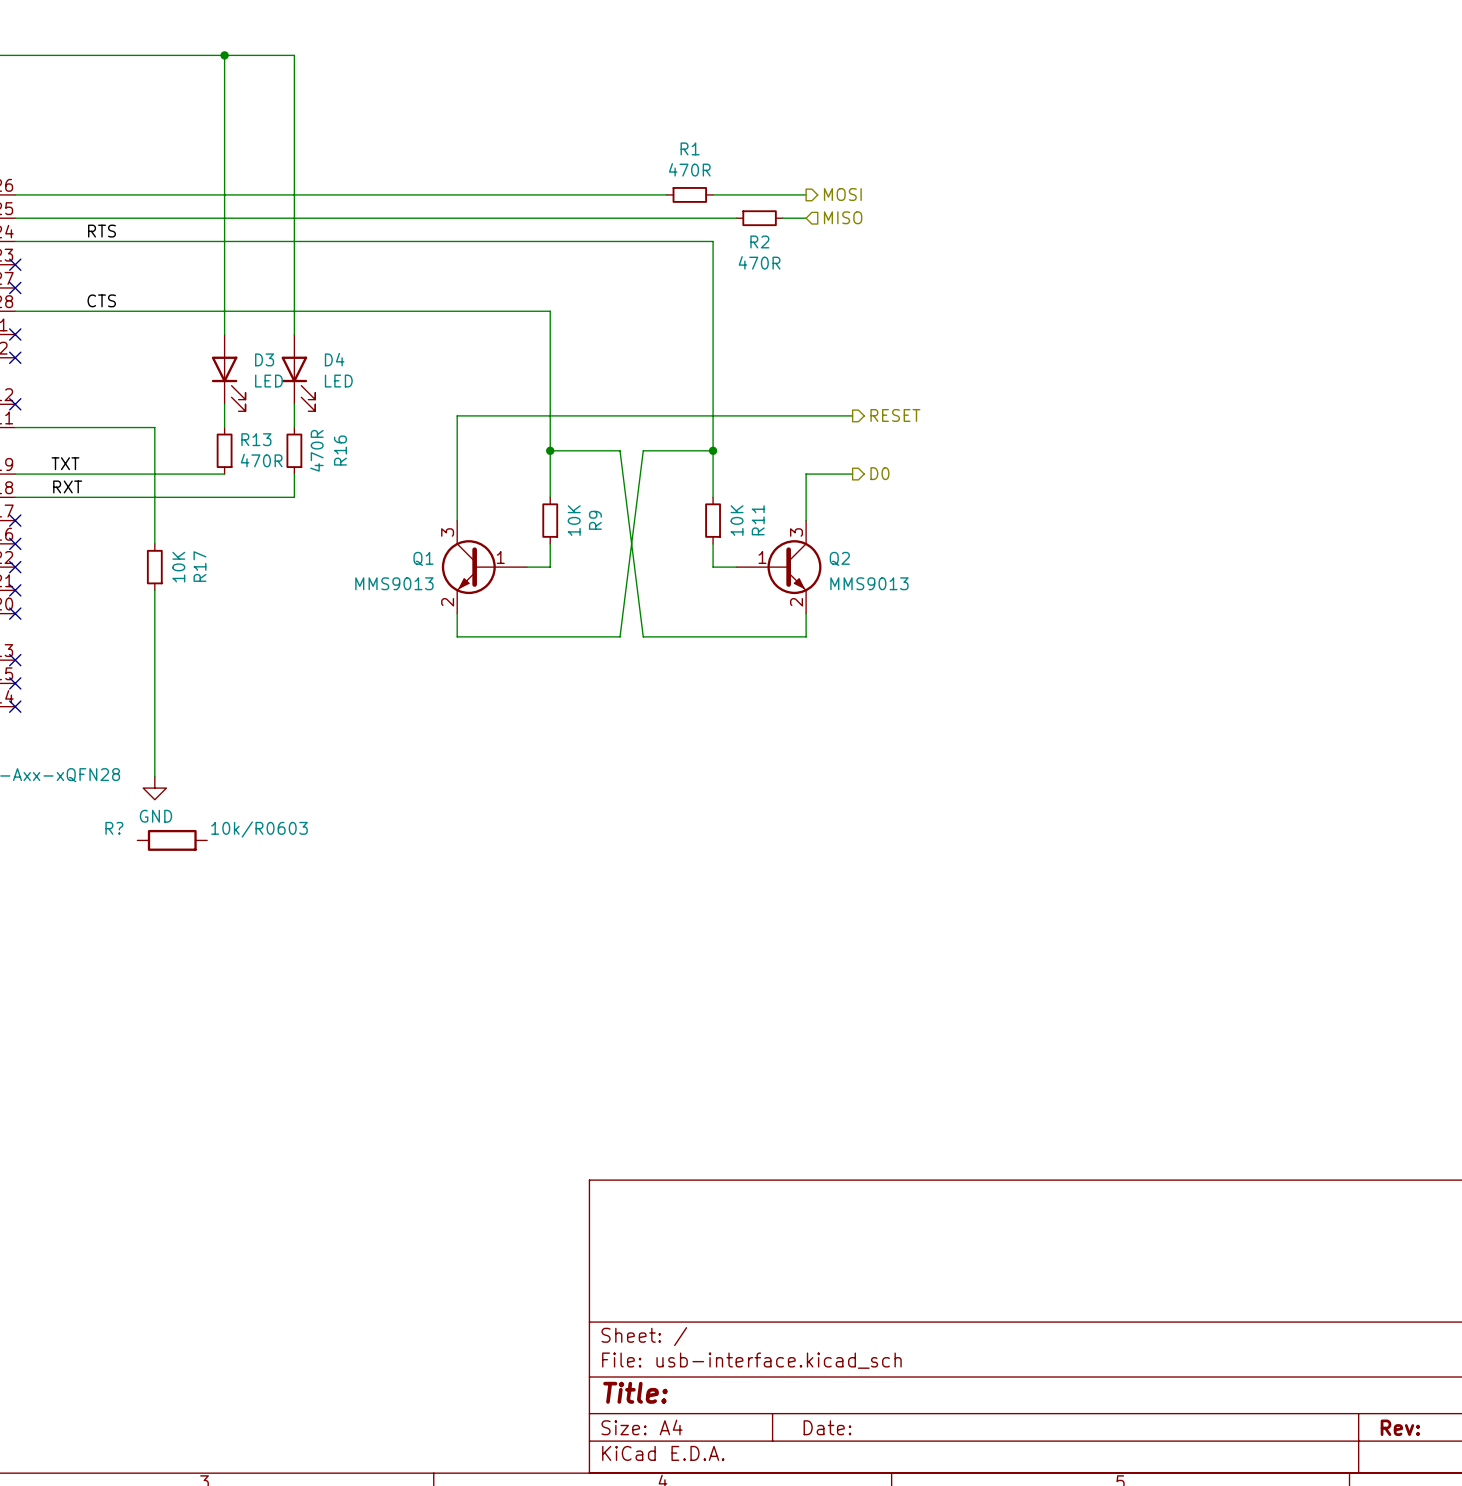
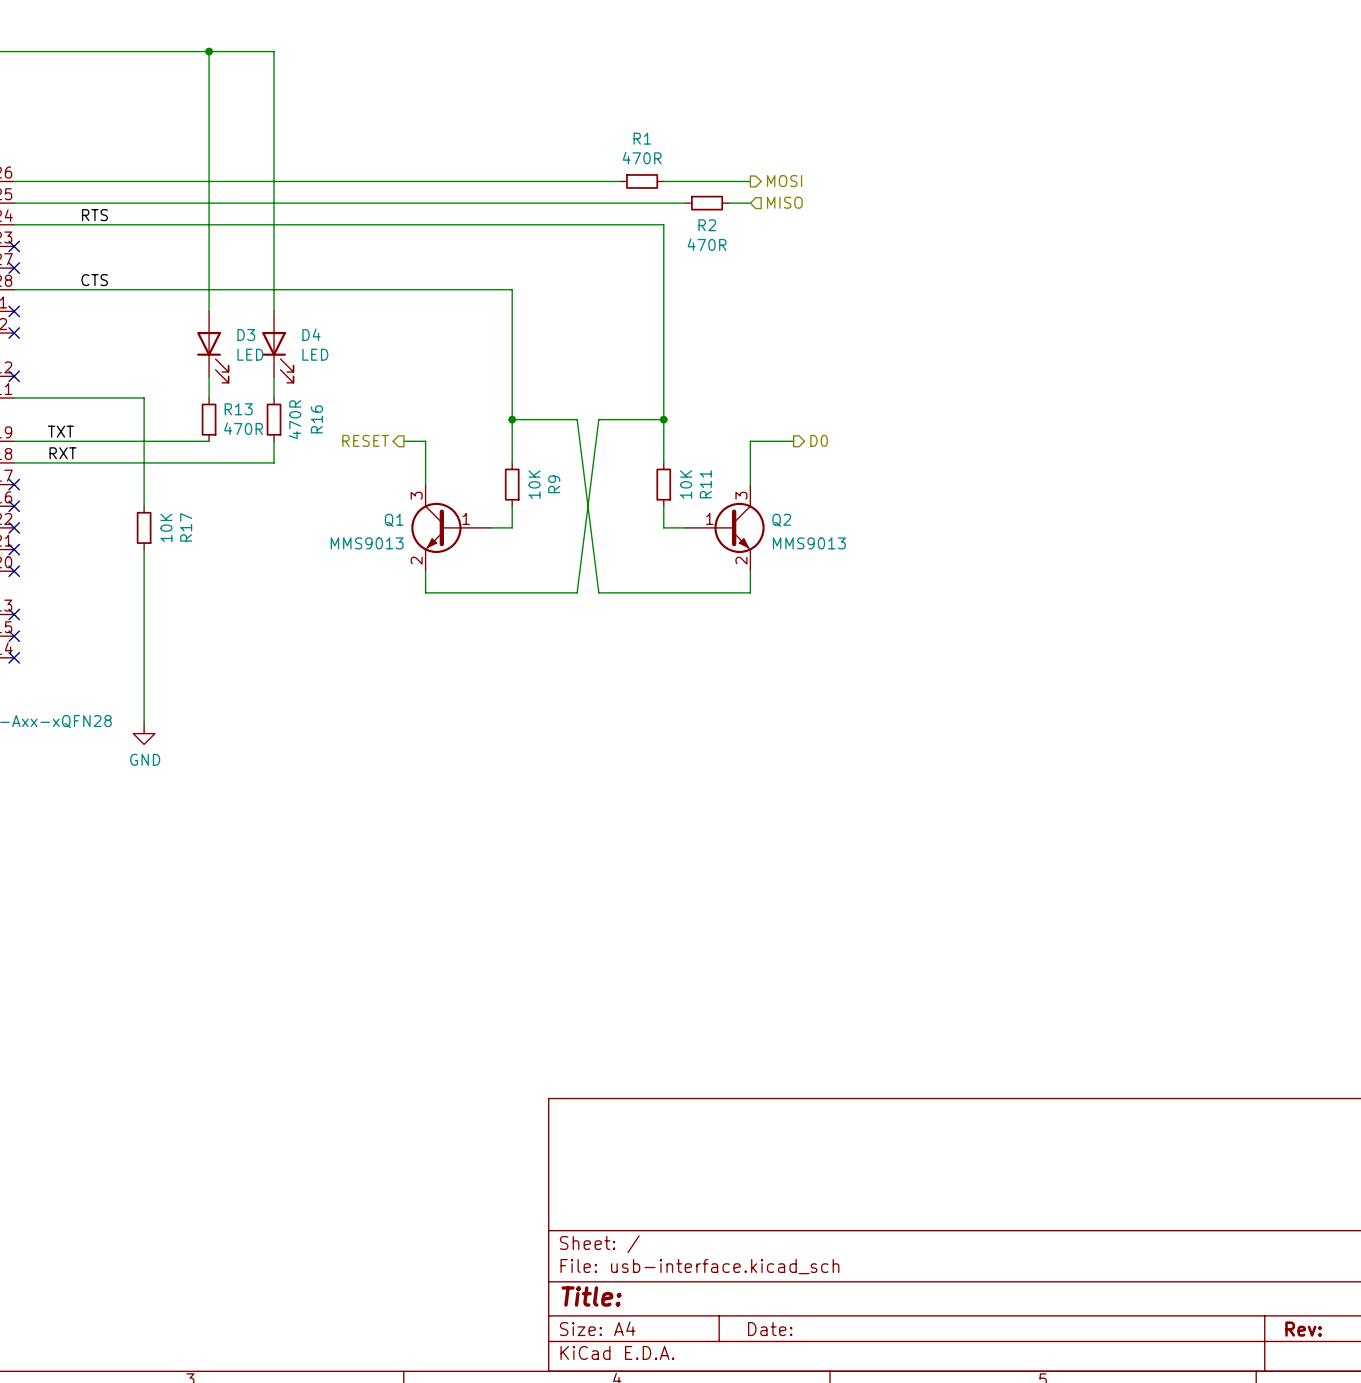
wire: (852, 415) (457, 415) (457, 474) -> (403, 441) (425, 441)
hierarchical label: RESET (895, 415) -> none
hierarchical label: none -> RESET (365, 440)
R?: 10k/R0603 (172, 840) -> none

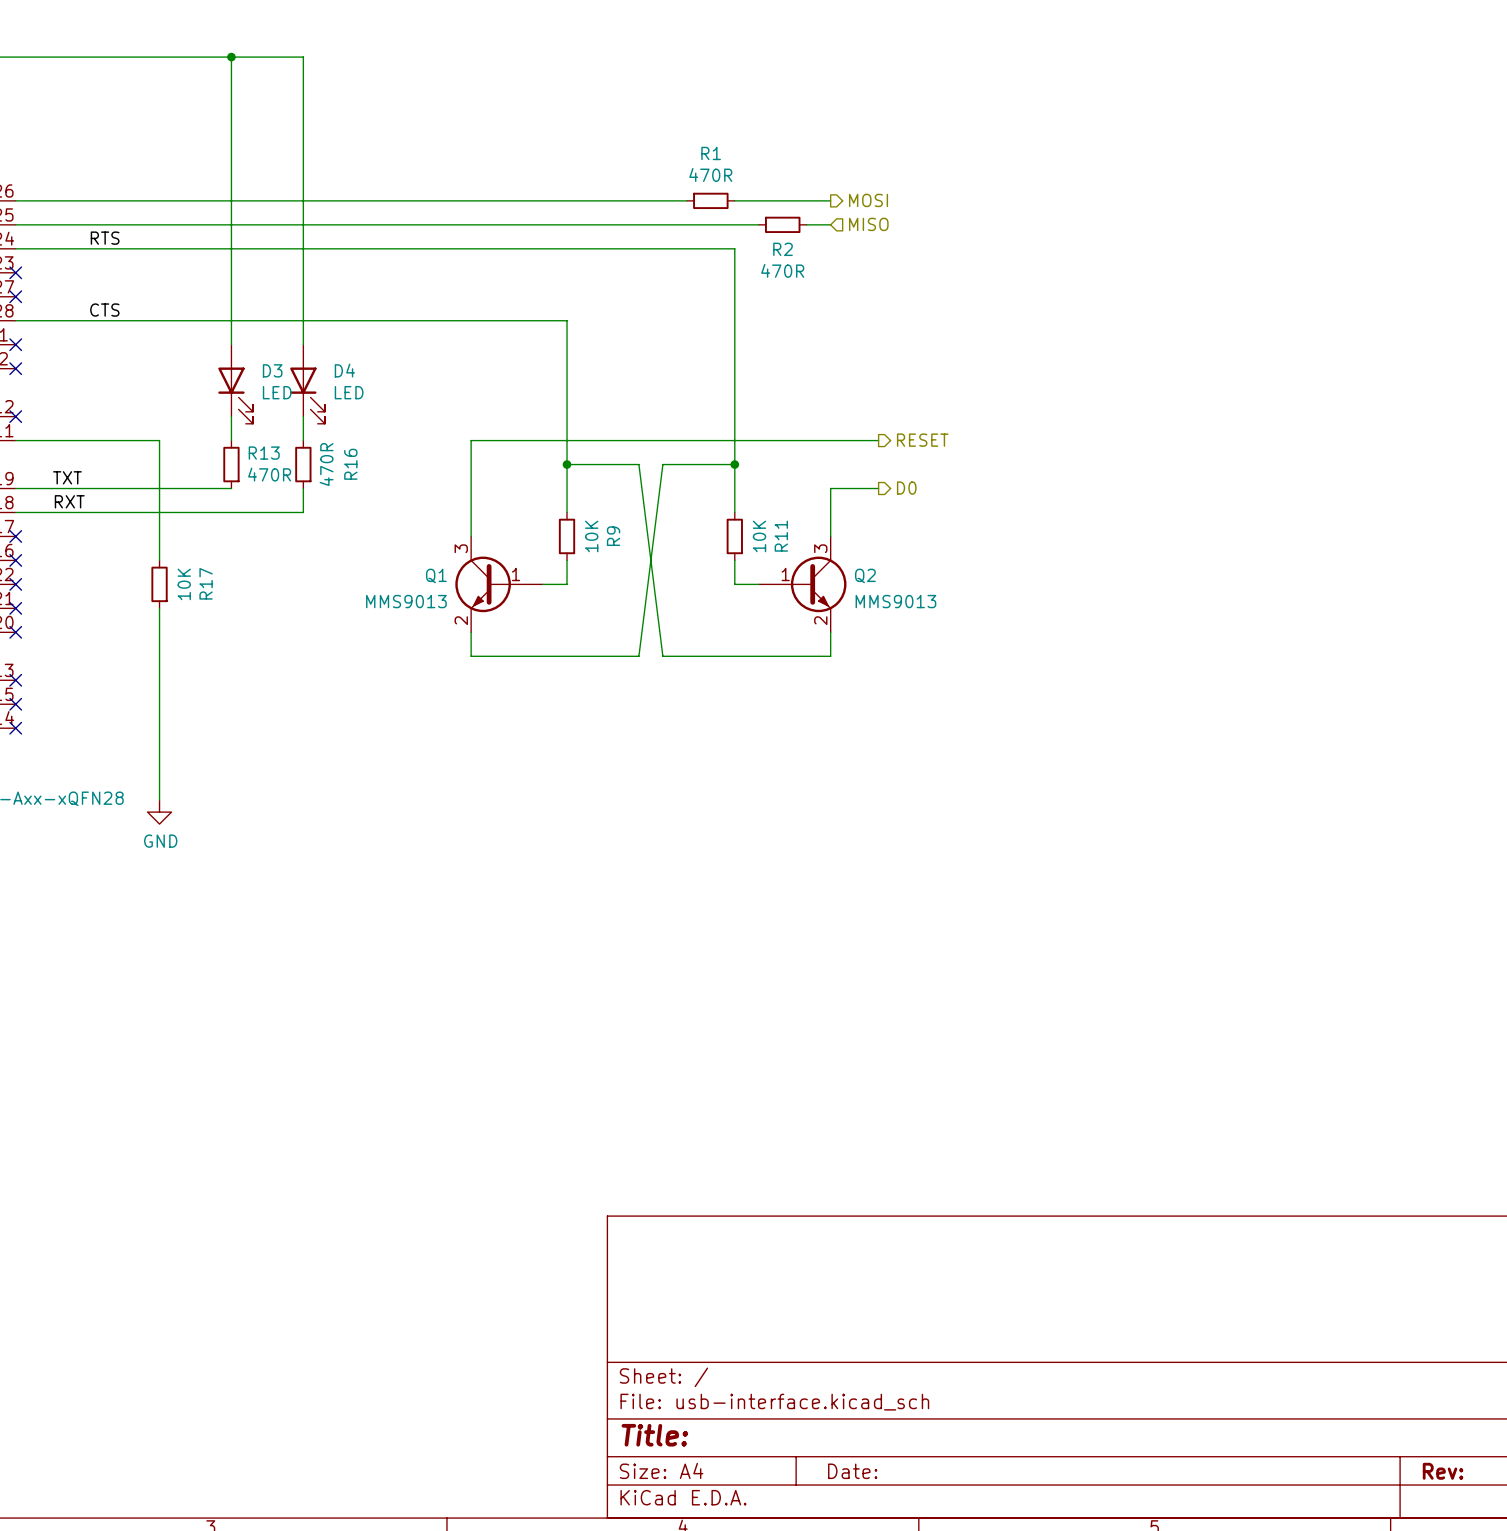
hierarchical label: none -> RESET (922, 440)
hierarchical label: RESET (365, 440) -> none
wire: (403, 441) (425, 441) -> (878, 440) (471, 440) (471, 488)

